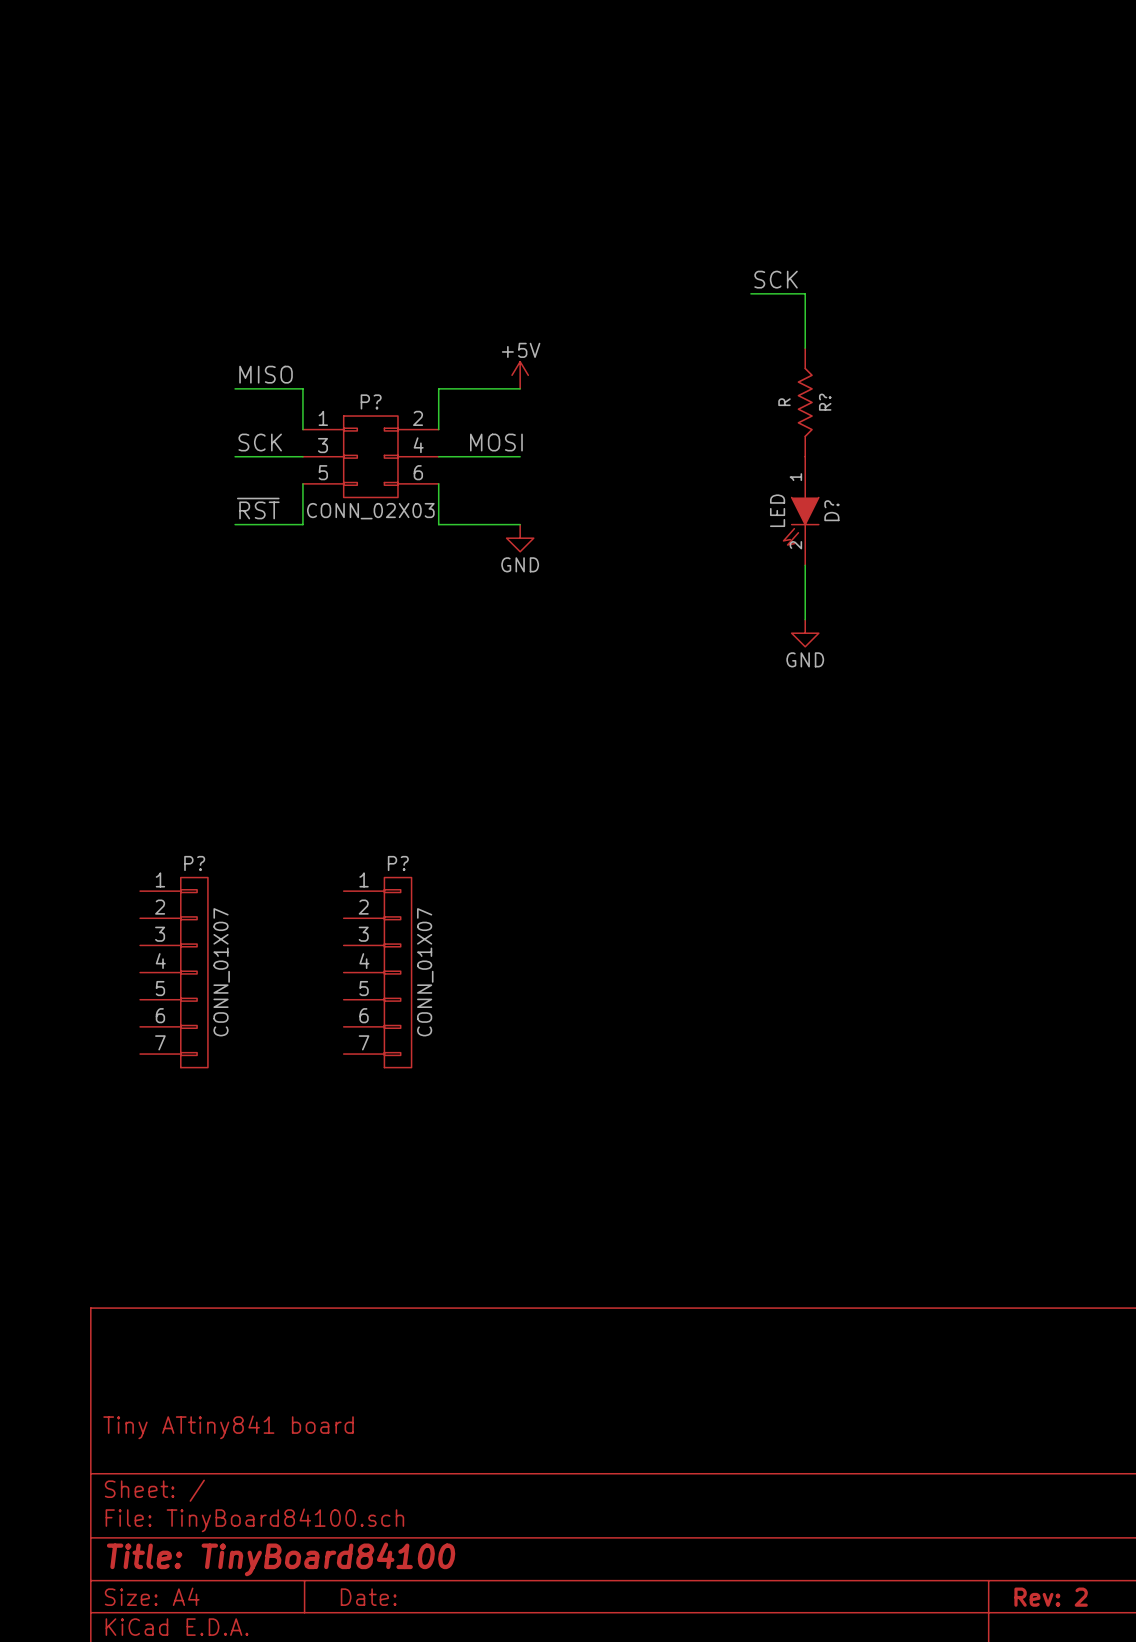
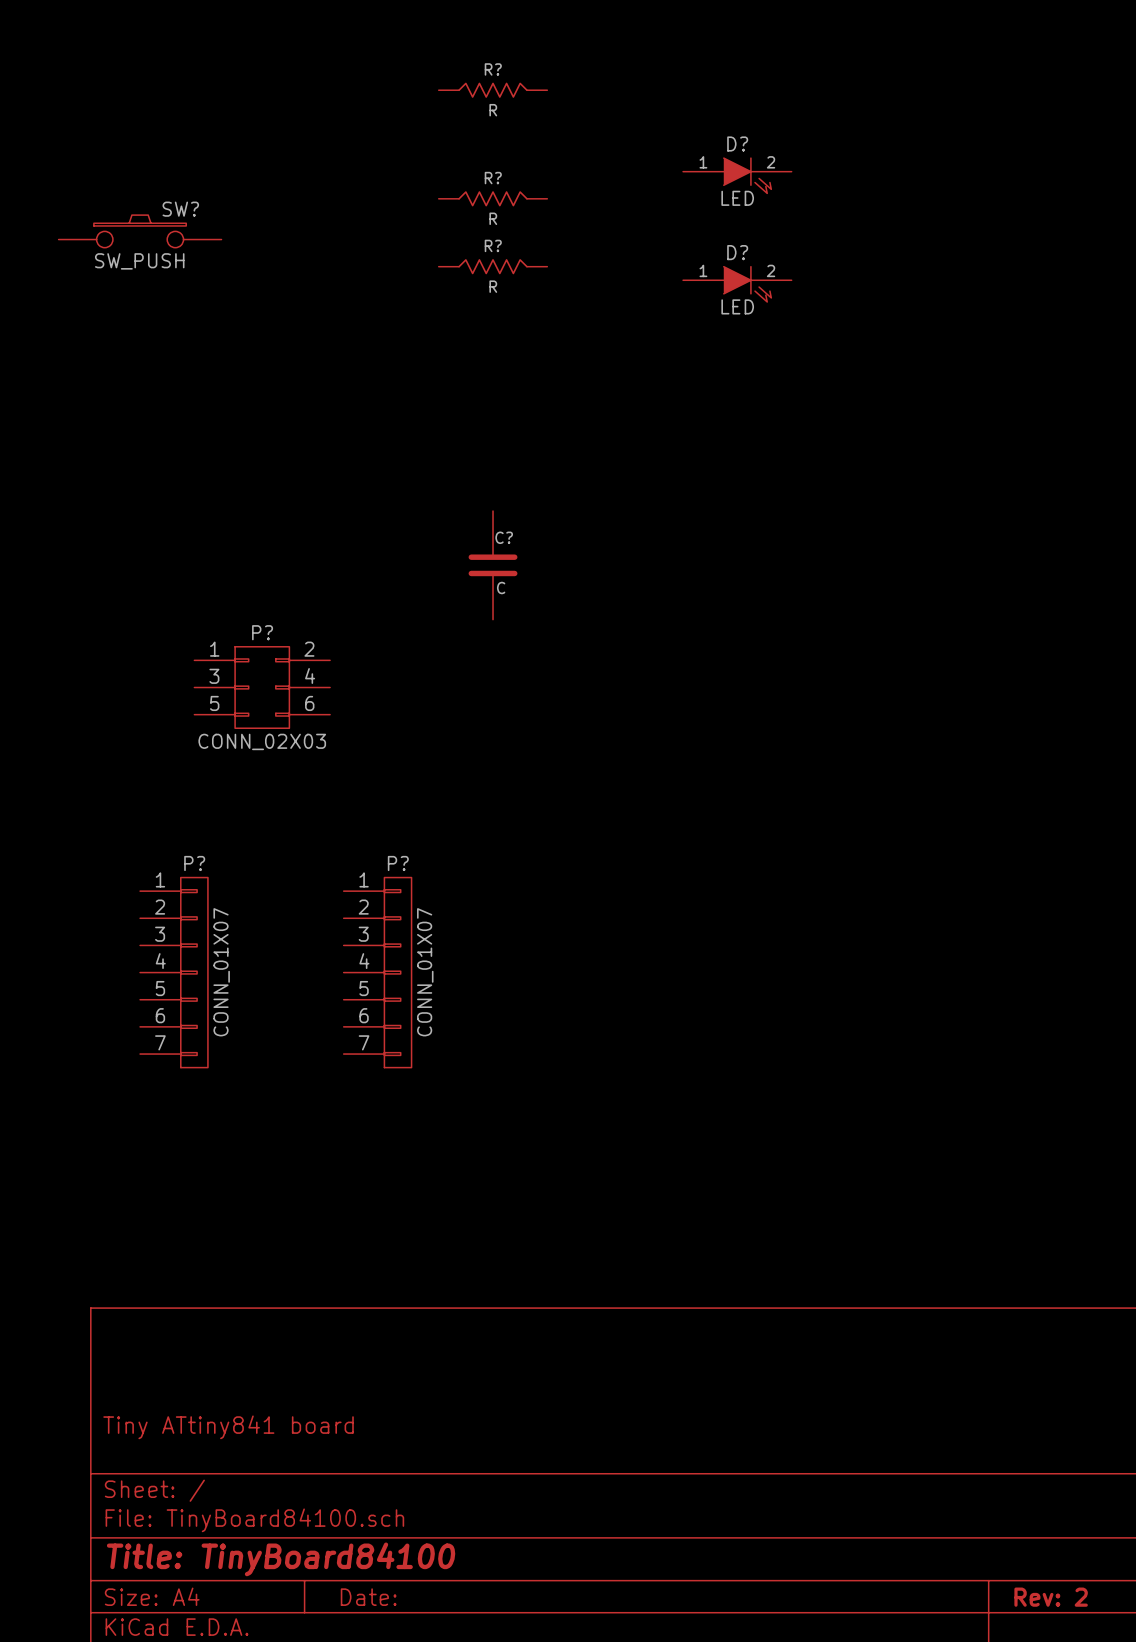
R?: none -> R (493, 90)
D?: none -> LED (737, 175)
R?: none -> R (493, 198)
SW?: none -> SW_PUSH (140, 231)
R?: none -> R (493, 266)
label: SCK (776, 279) -> none
D?: none -> LED (737, 284)
wire: (750, 293) (805, 293) (805, 348) -> none
label: MISO (266, 374) -> none
power symbol: +5V (520, 375) -> none
wire: (235, 388) (302, 388) (302, 429) -> none
wire: (520, 388) (438, 388) (438, 429) -> none
R?: R (805, 402) -> none
label: SCK (260, 442) -> none
label: MOSI (496, 442) -> none
wire: (235, 456) (302, 456) -> none
P? position: (370, 456) -> (262, 687)
wire: (438, 456) (520, 456) -> none
wire: (302, 483) (302, 524) (235, 524) -> none
wire: (438, 483) (438, 524) (520, 524) -> none
label: ~{RST} (258, 508) -> none
D?: LED (801, 511) -> none
power symbol: GND (520, 538) -> none
C?: none -> C (493, 565)
wire: (805, 565) (805, 619) -> none
power symbol: GND (805, 633) -> none

